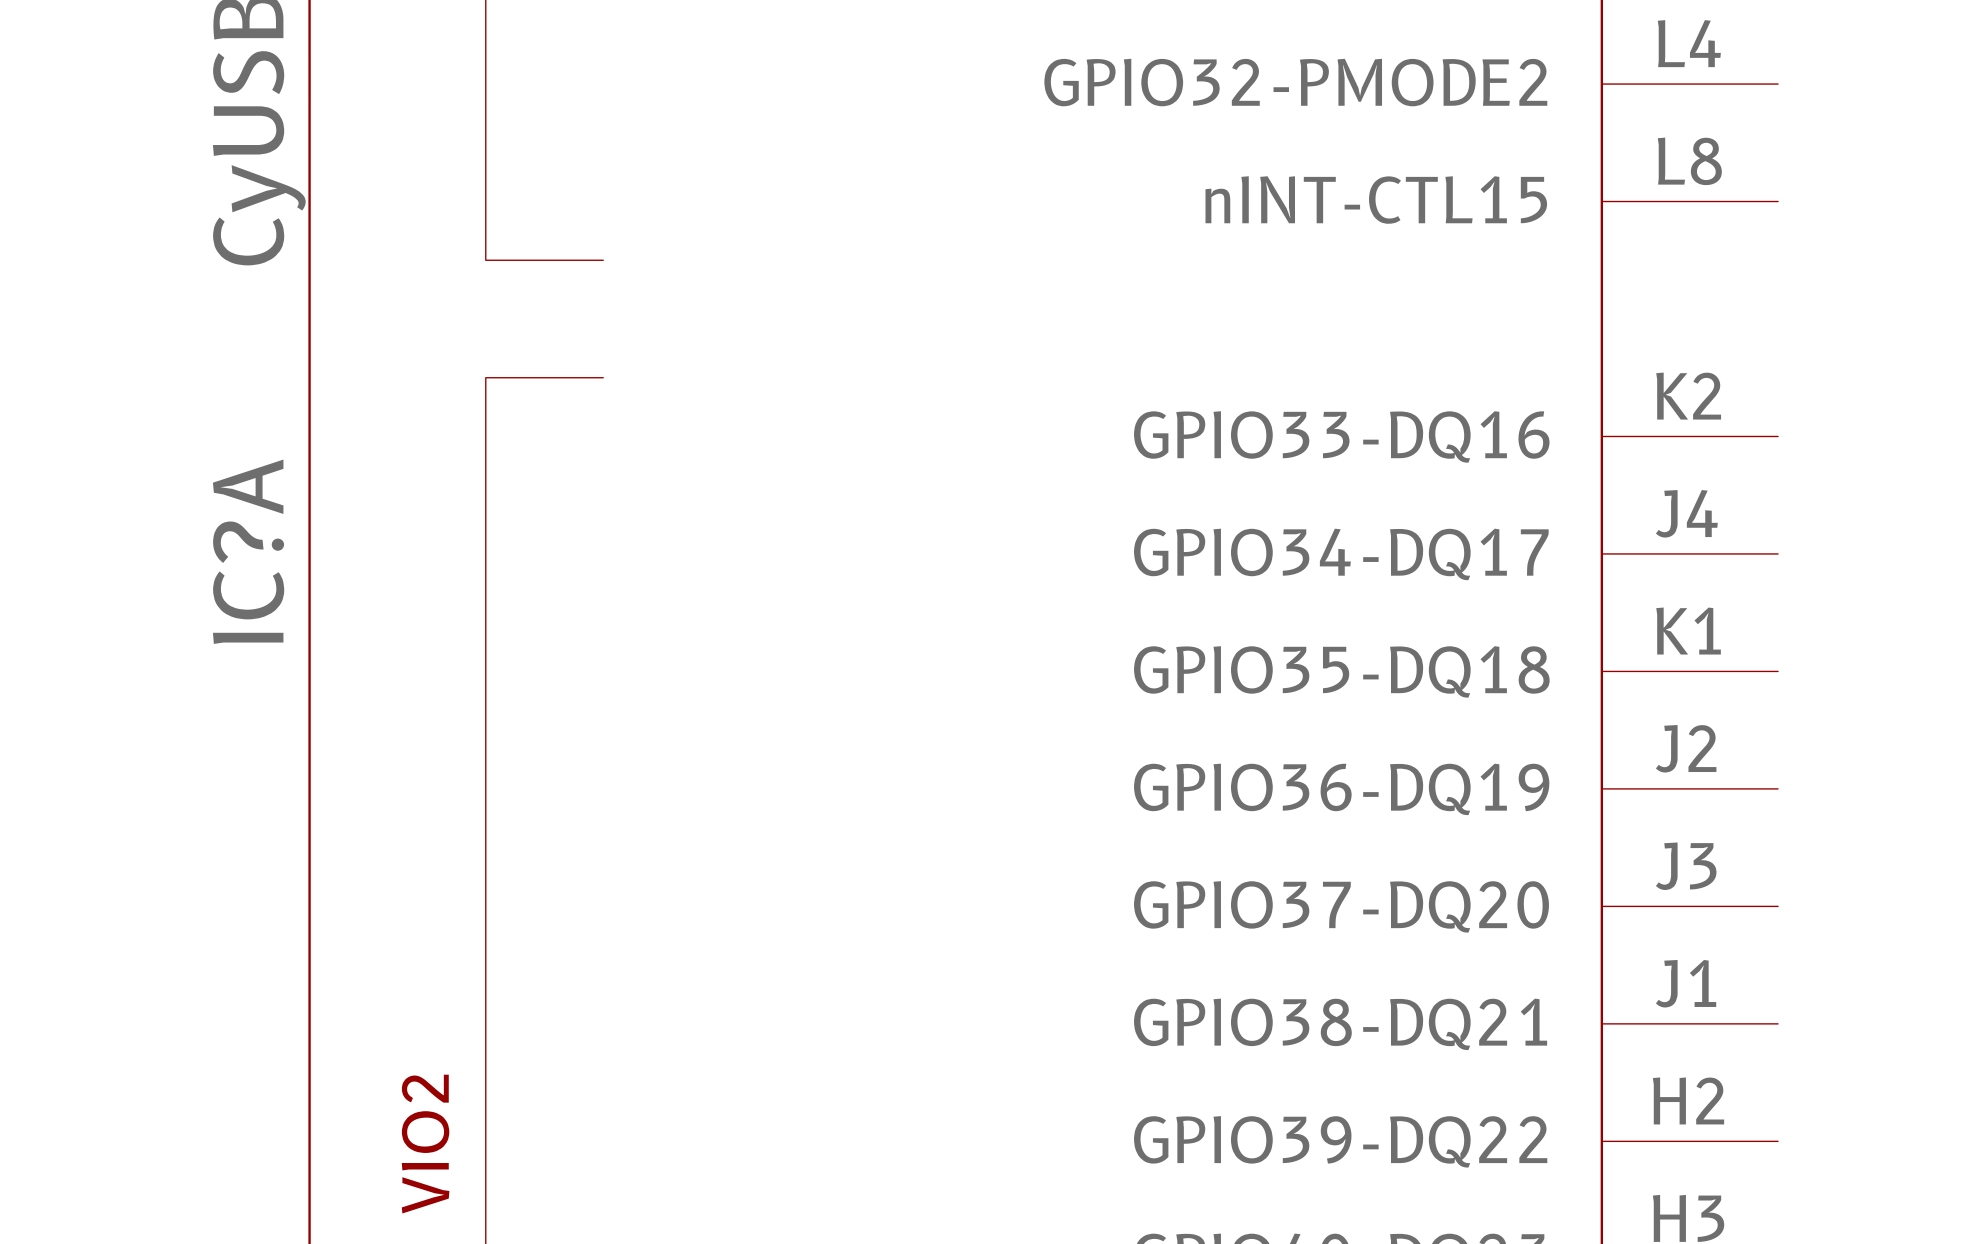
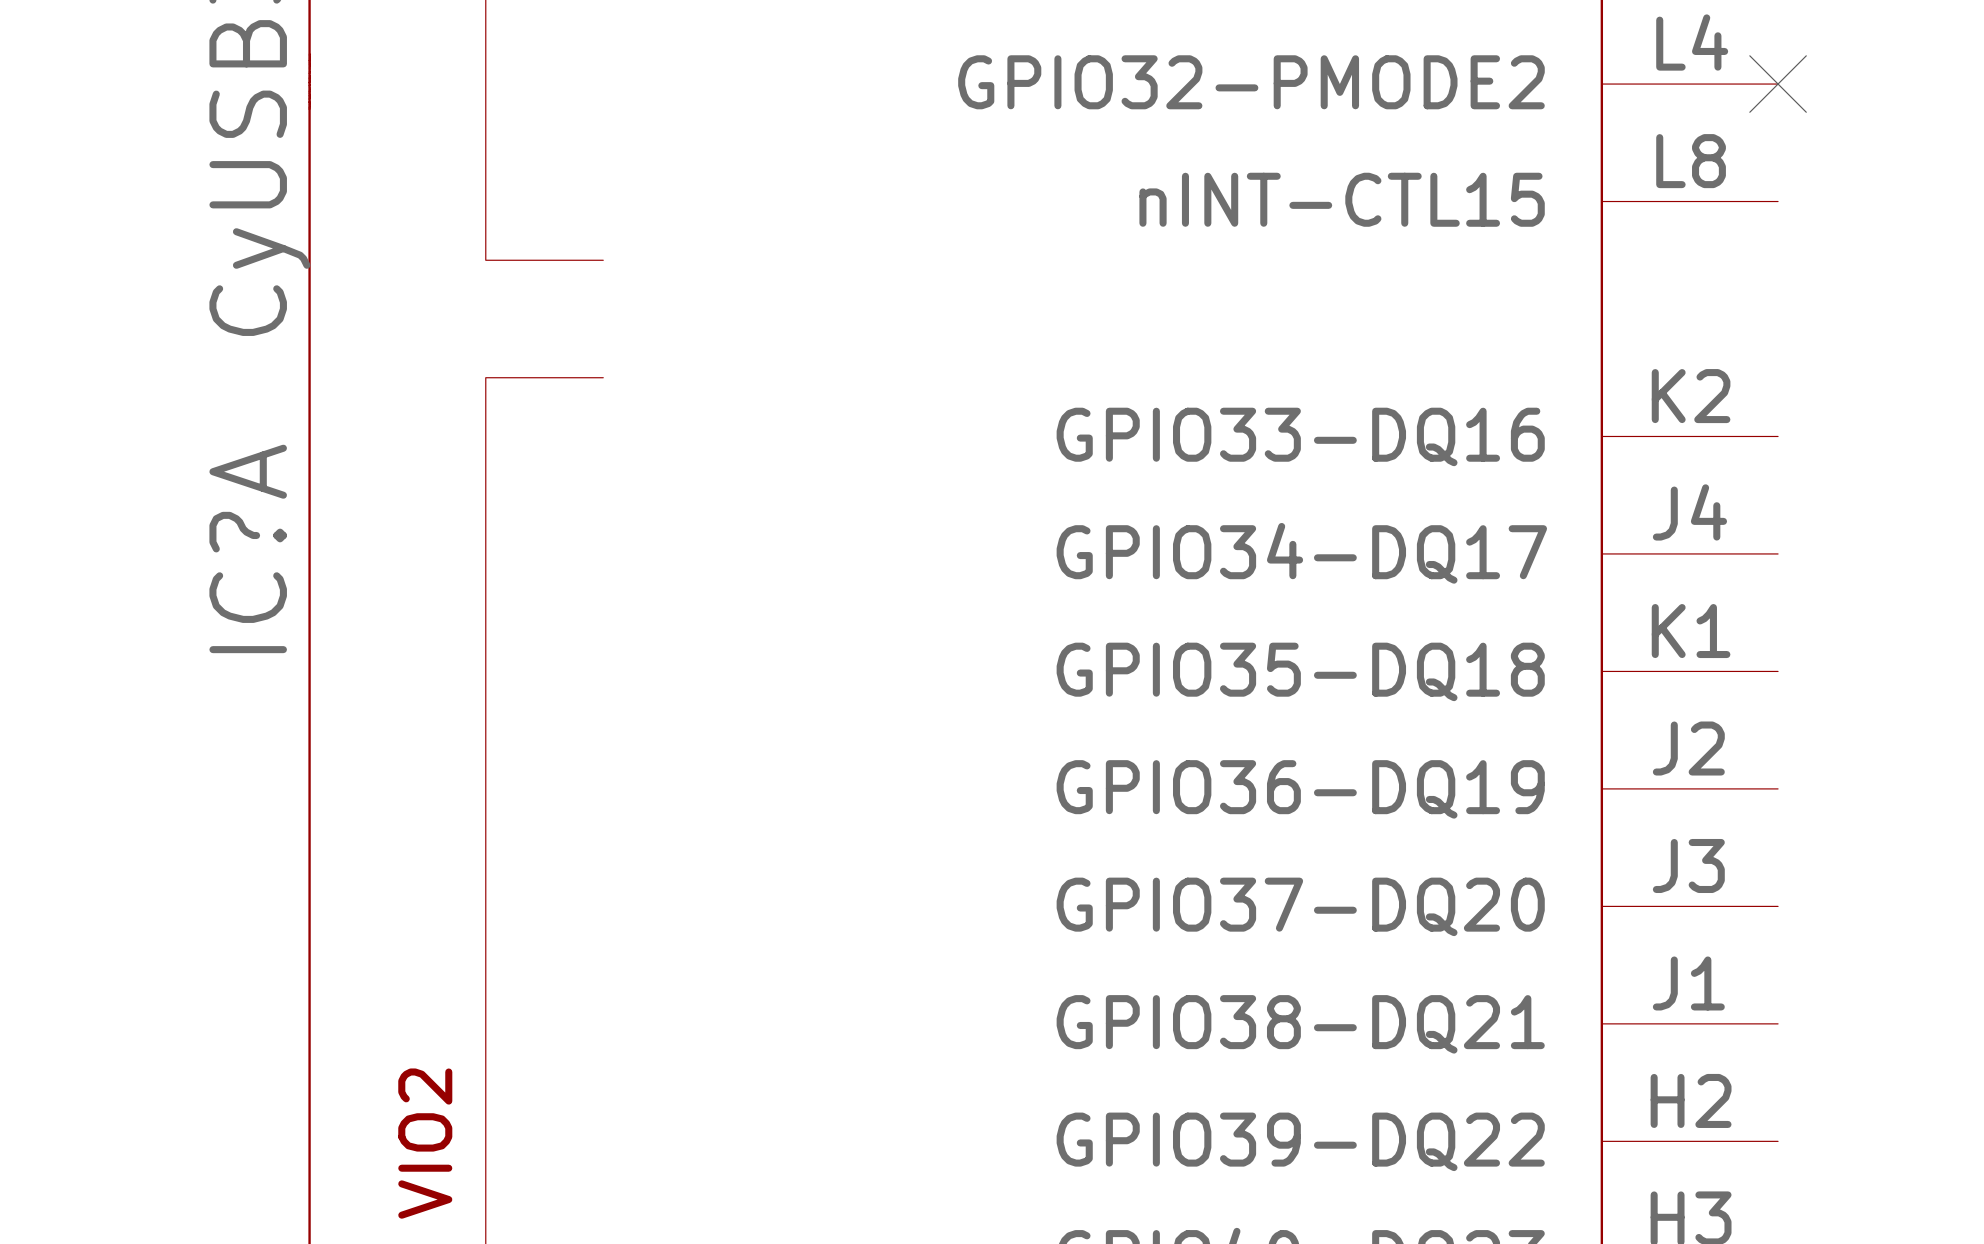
no-connect mark: none -> (1778, 84)

